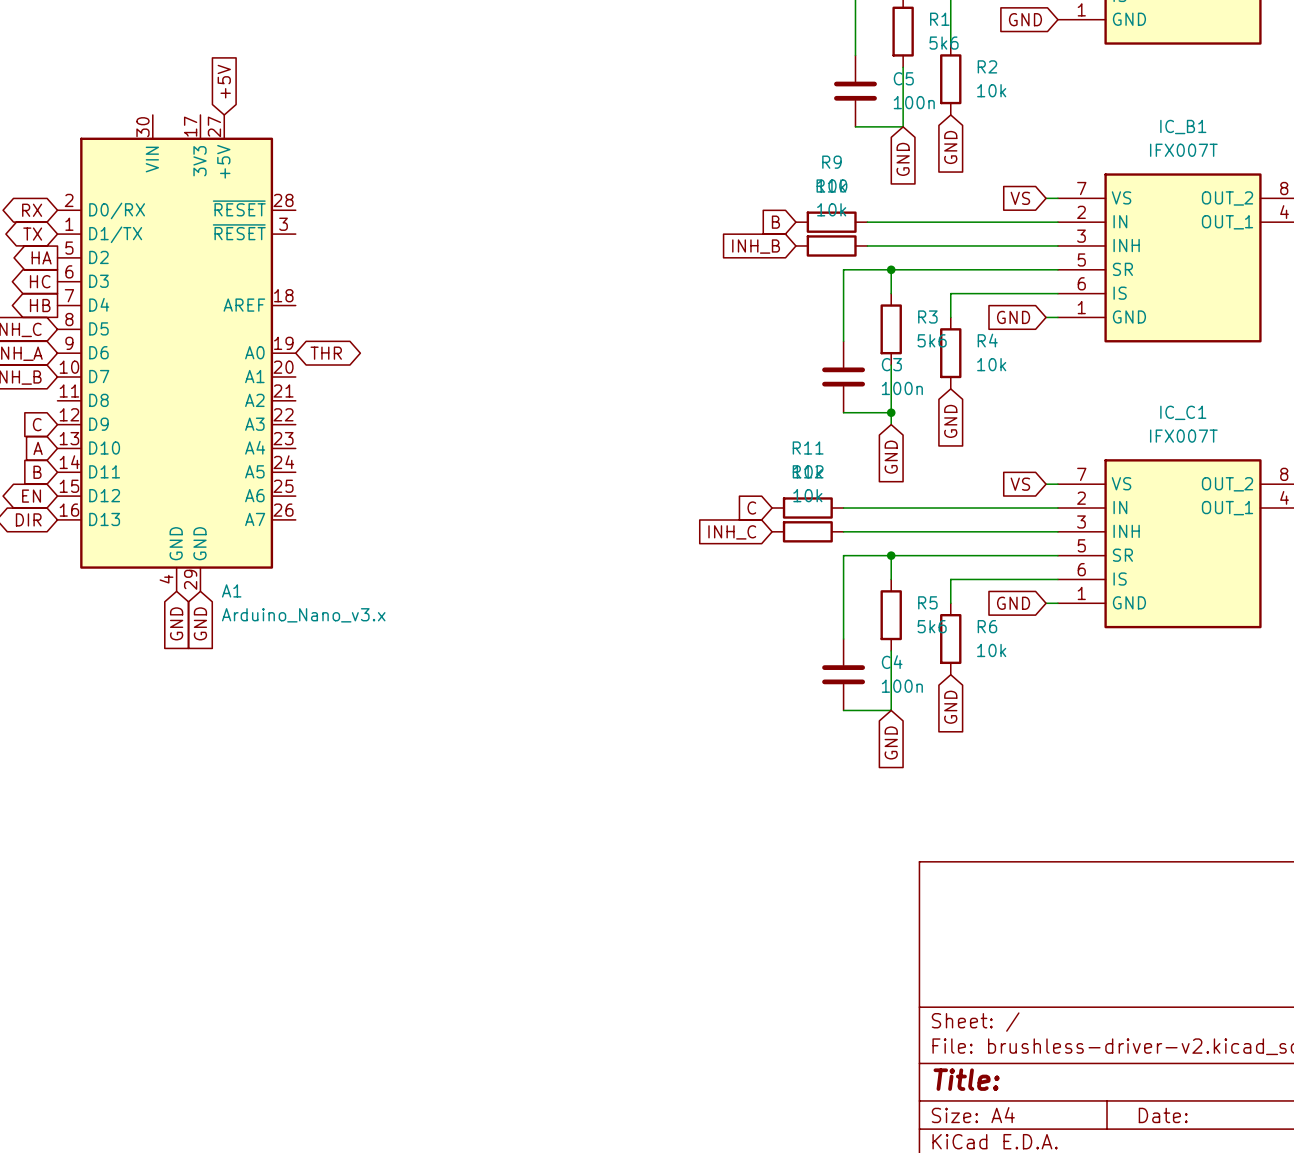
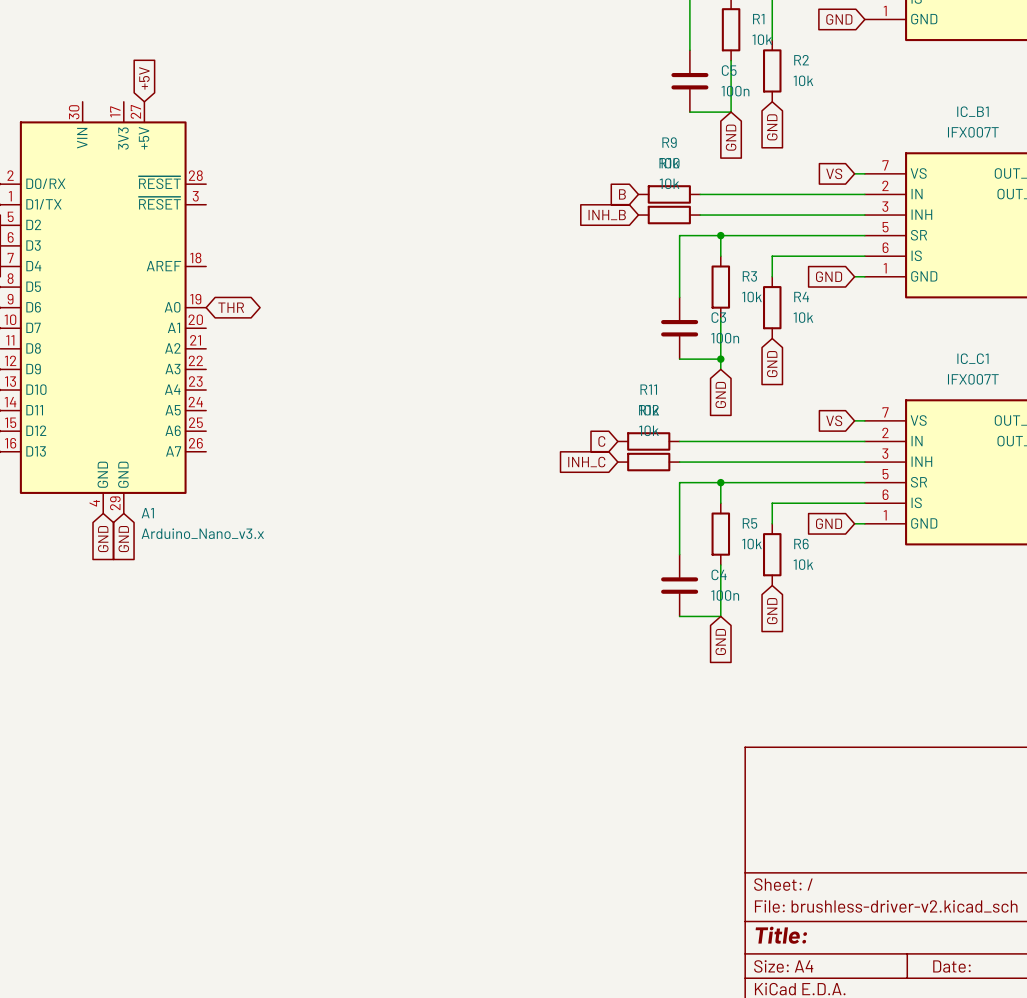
R1 value: 5k6 (944, 43) -> 10k (762, 39)
R3 value: 5k6 (932, 340) -> 10k (751, 296)
R5 value: 5k6 (932, 626) -> 10k (751, 544)

